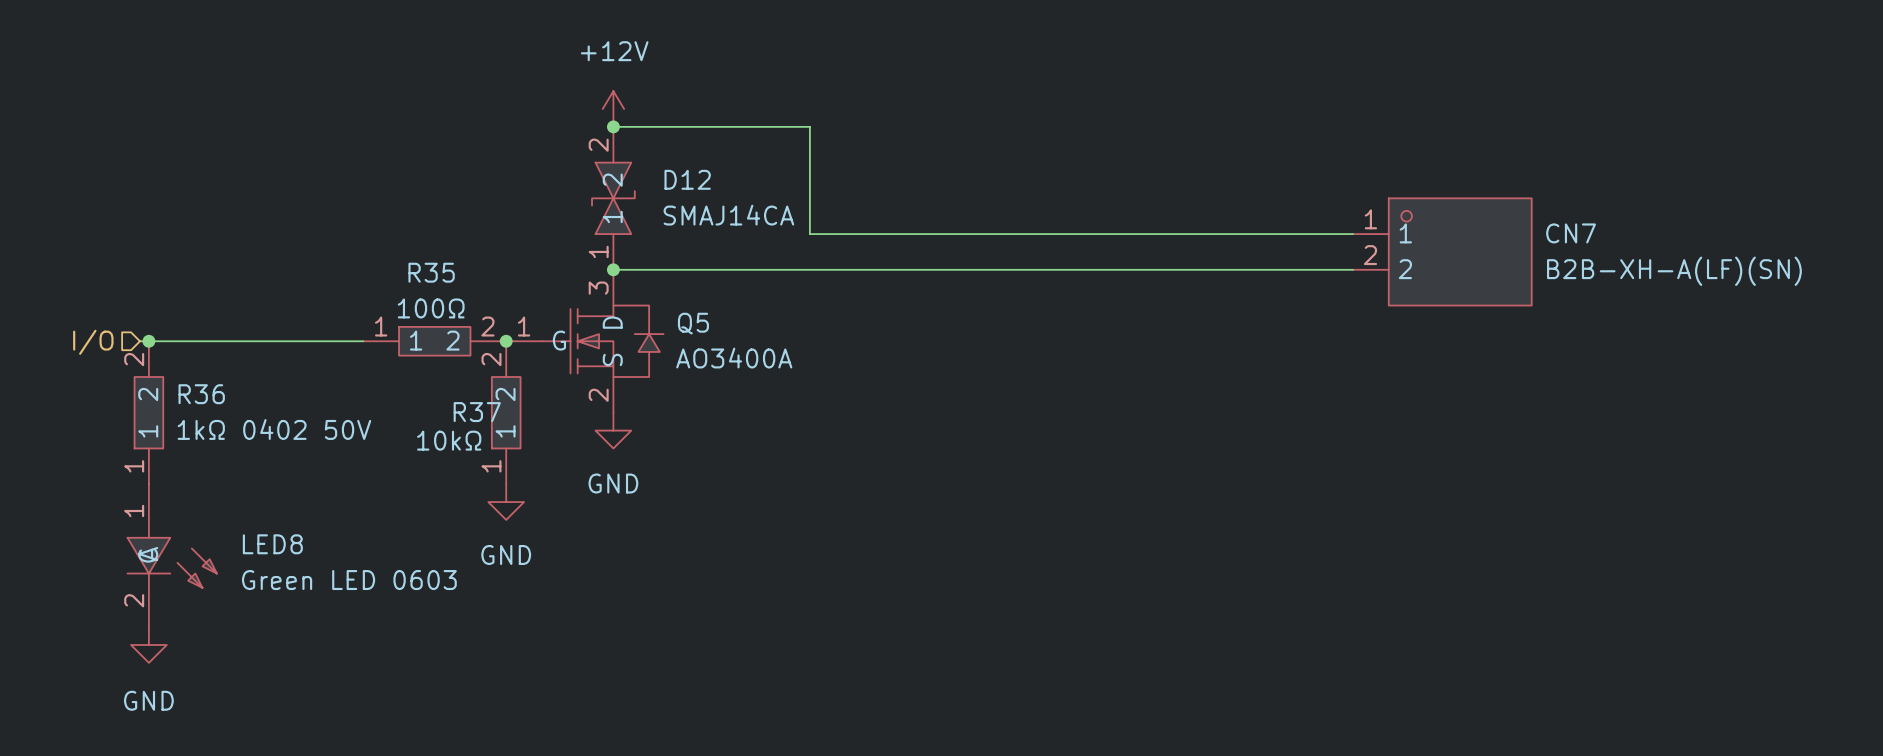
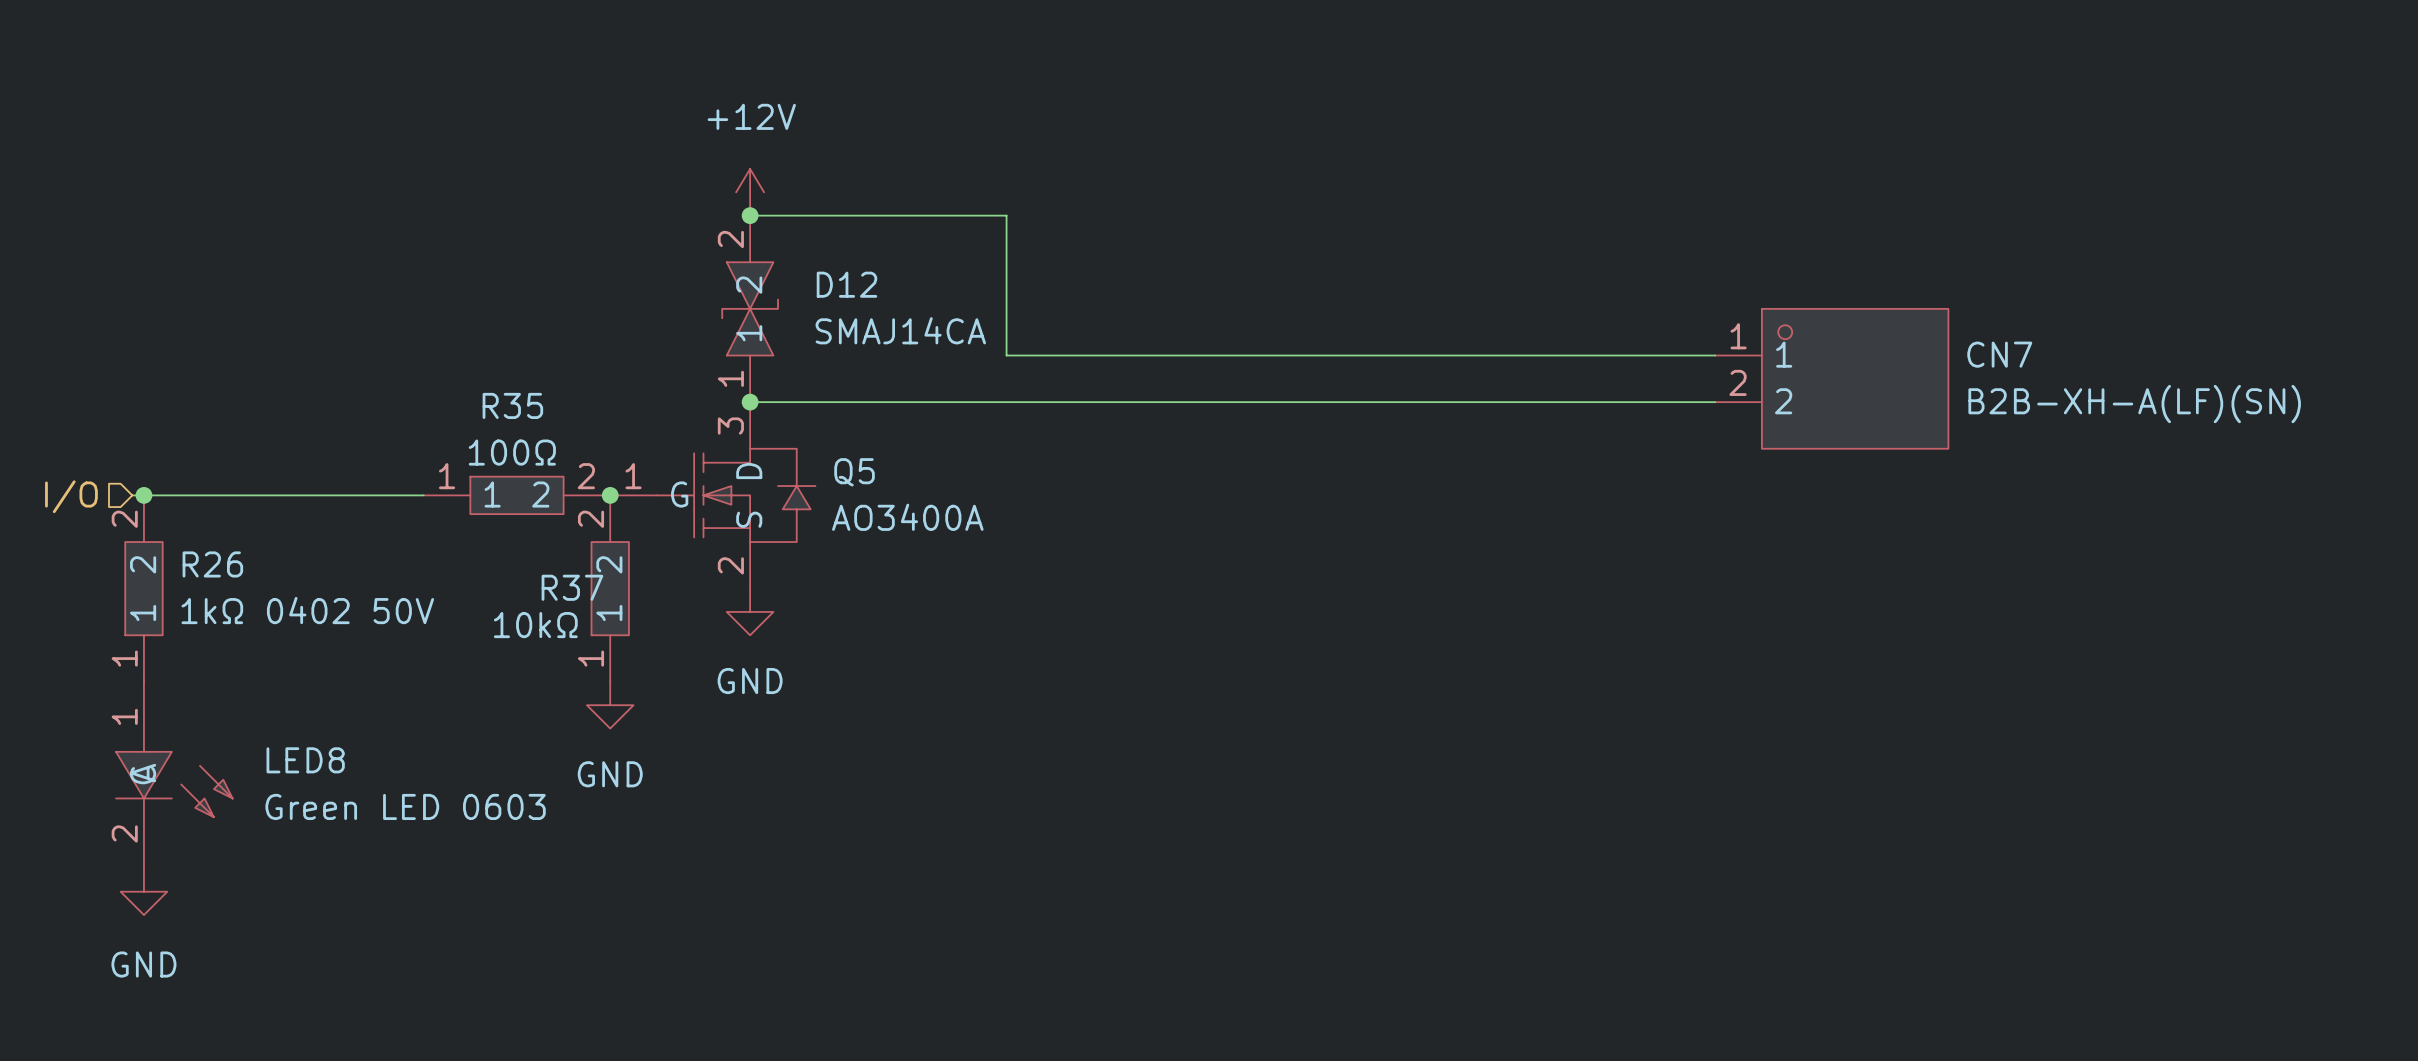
R36 name: R36 (201, 394) -> R26 (212, 564)

